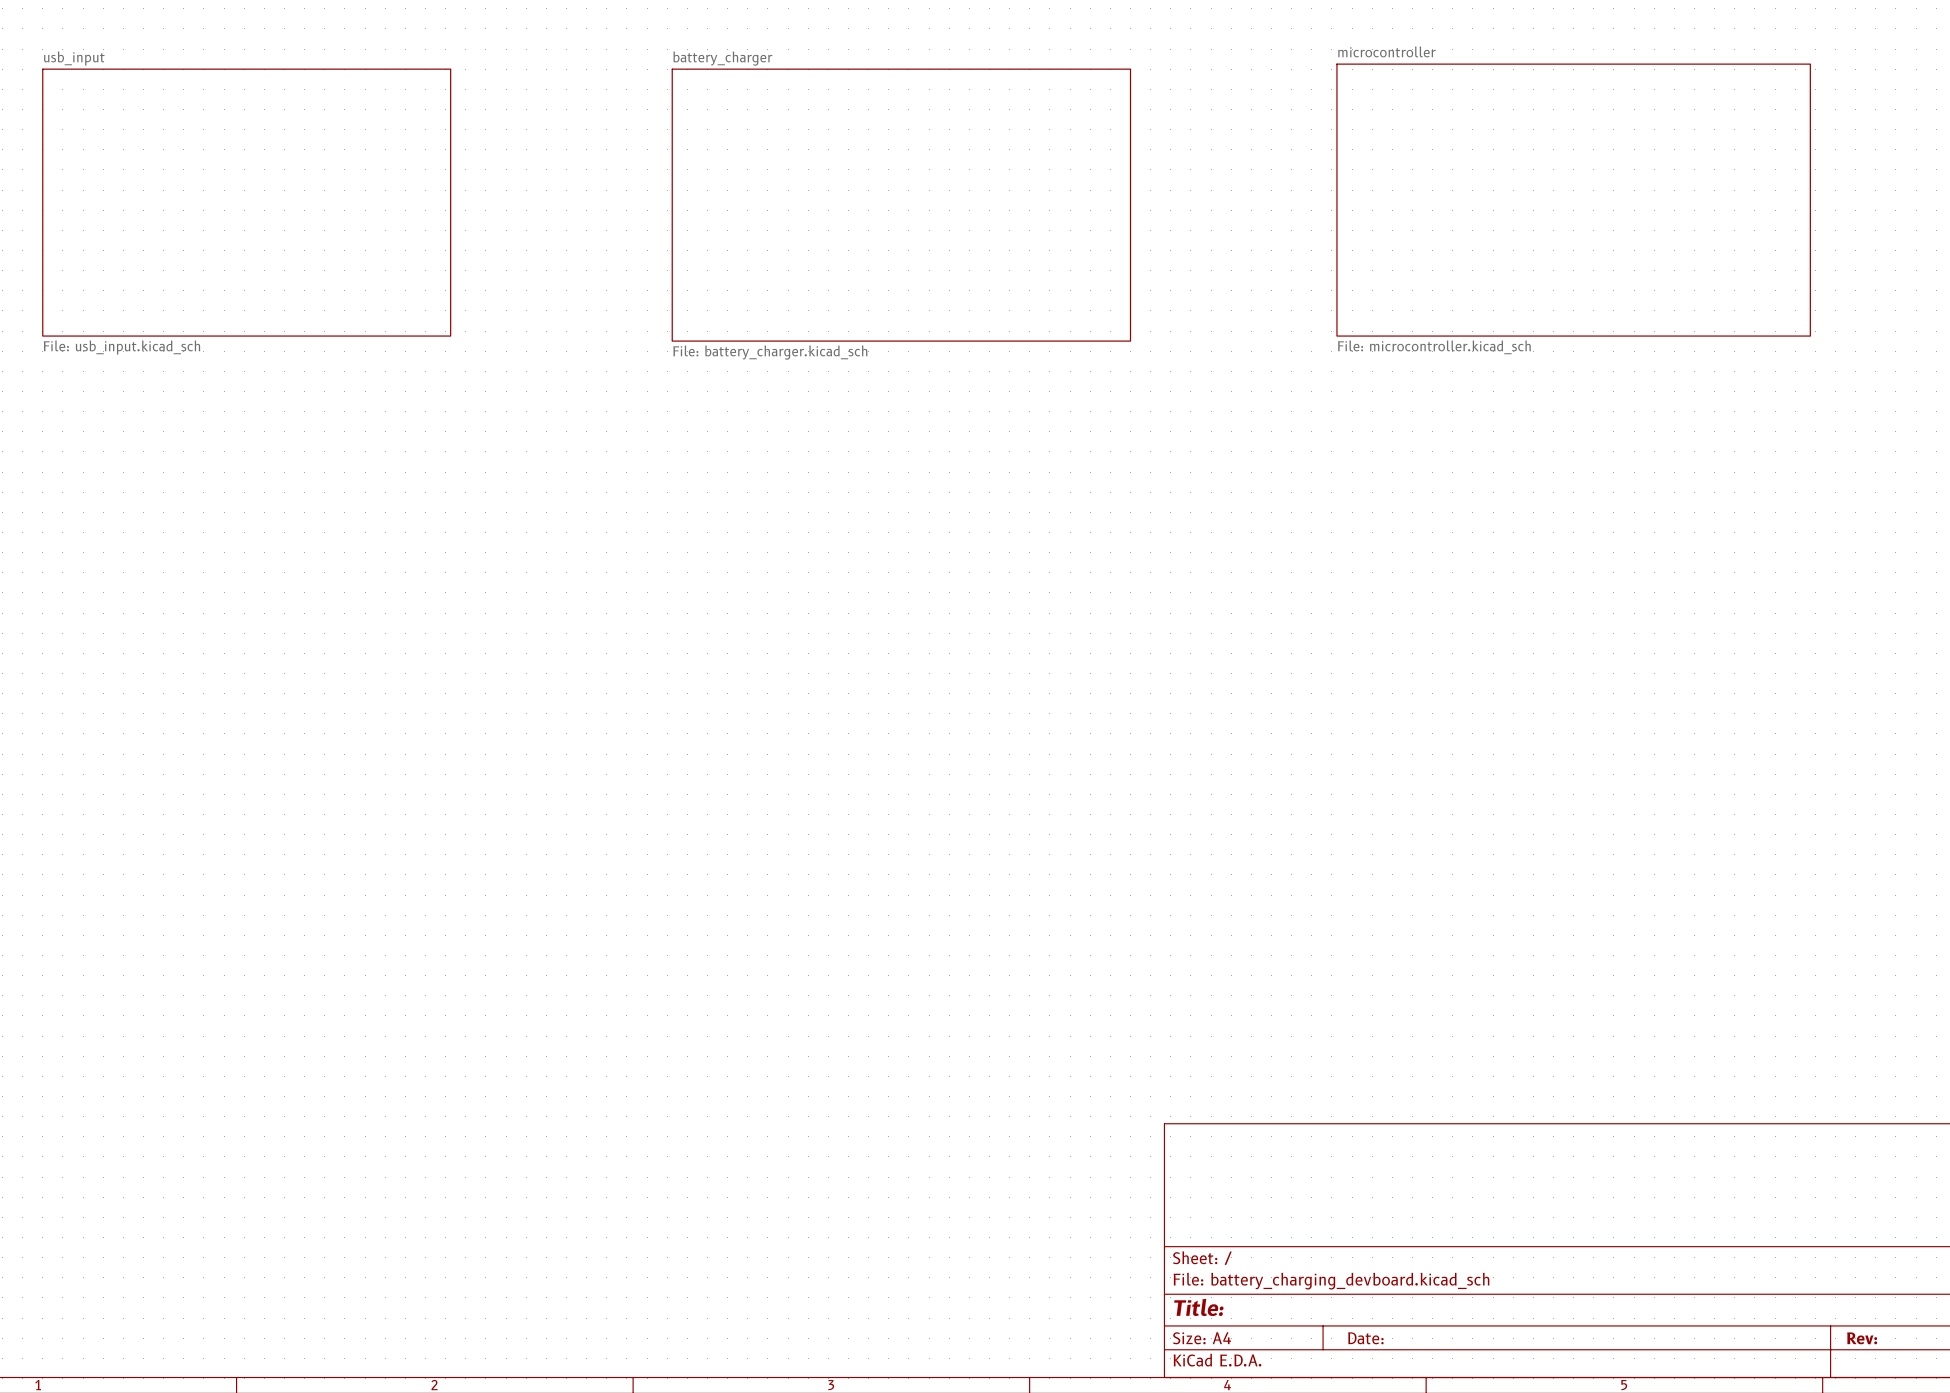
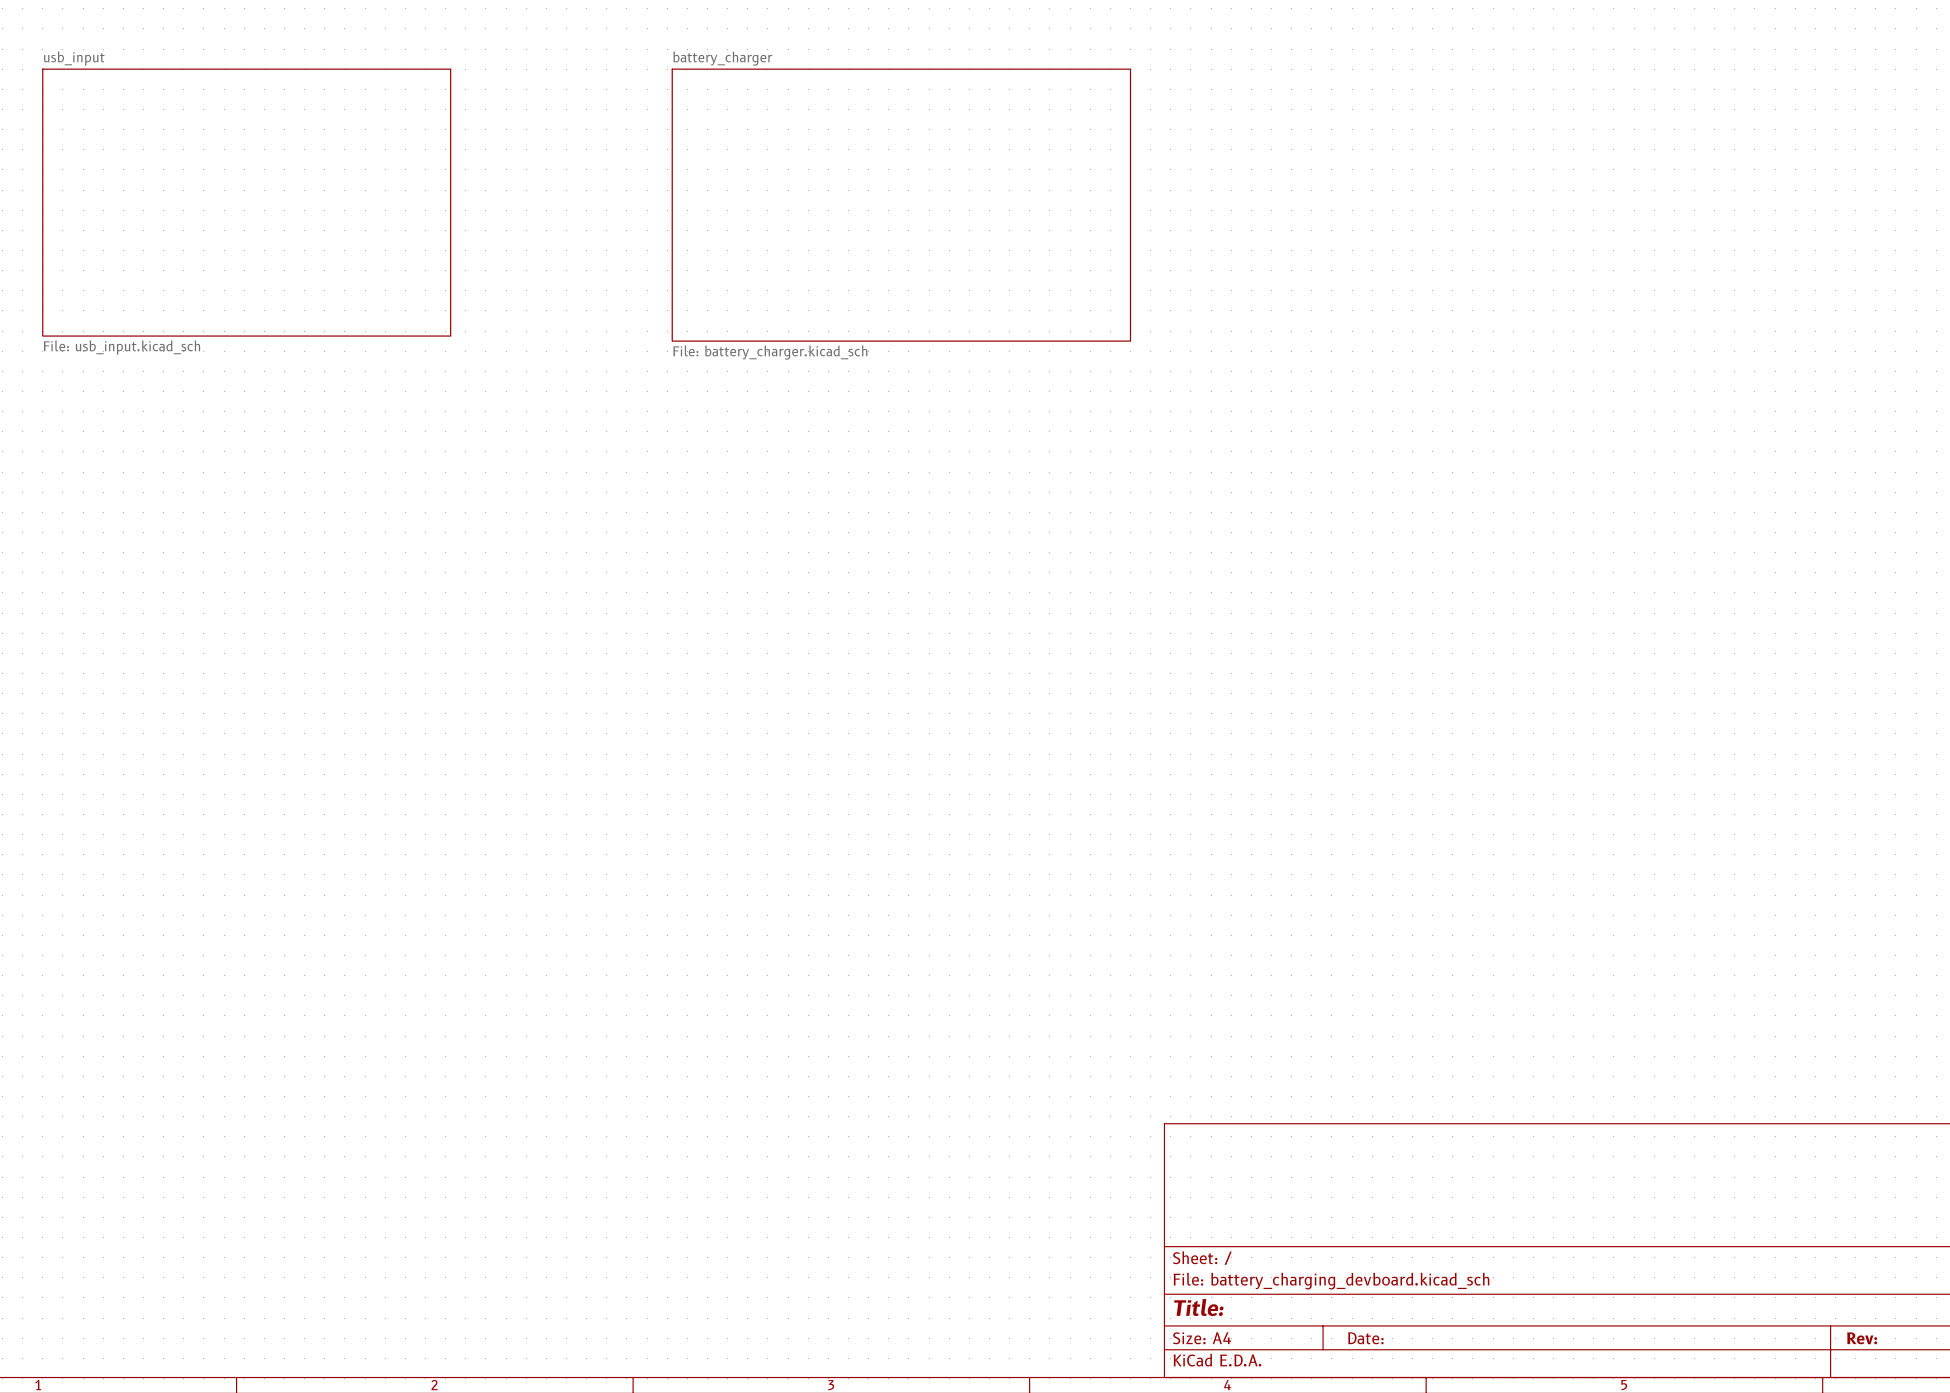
sheet microcontroller: File: microcontroller.kicad_sch (1573, 200) -> none

